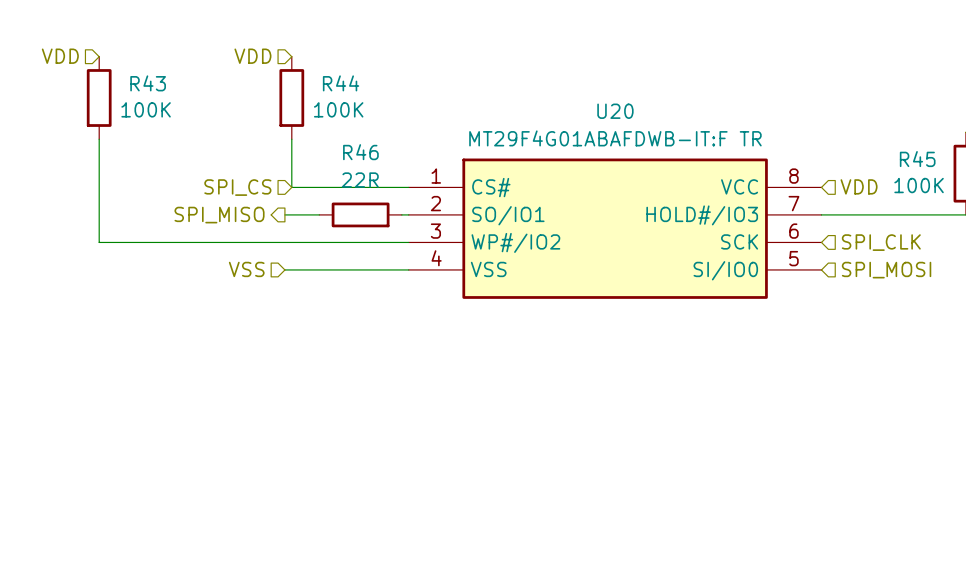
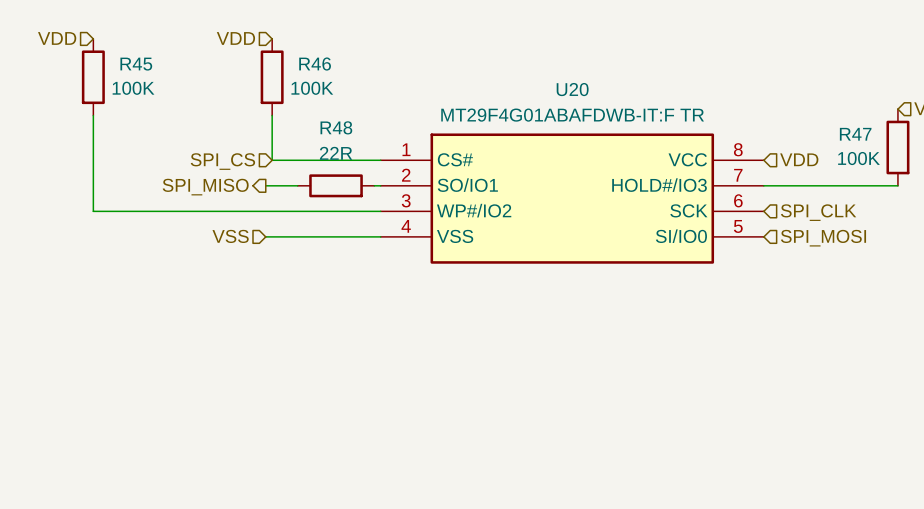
R43 name: R43 (148, 83) -> R45 (136, 64)
R44 name: R44 (341, 83) -> R46 (315, 64)
R46 name: R46 (360, 152) -> R48 (336, 127)
R45 name: R45 (917, 159) -> R47 (855, 134)

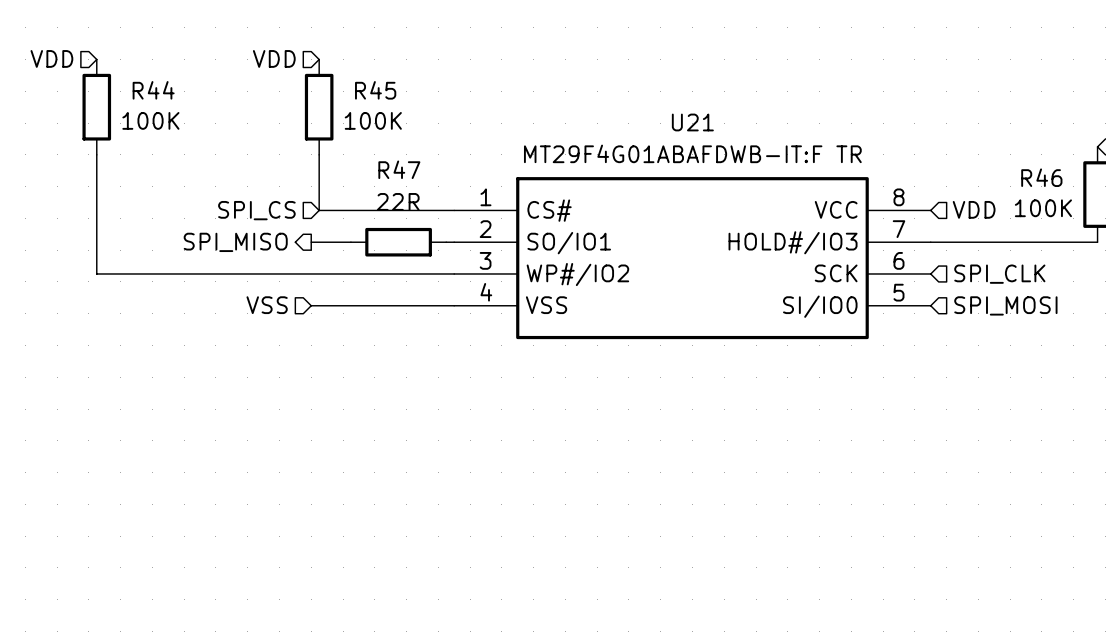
R45 name: R45 (136, 64) -> R44 (153, 90)
R46 name: R46 (315, 64) -> R45 (375, 90)
U20 name: U20 (572, 89) -> U21 (692, 122)
R48 name: R48 (336, 127) -> R47 (399, 169)
R47 name: R47 (855, 134) -> R46 (1041, 177)

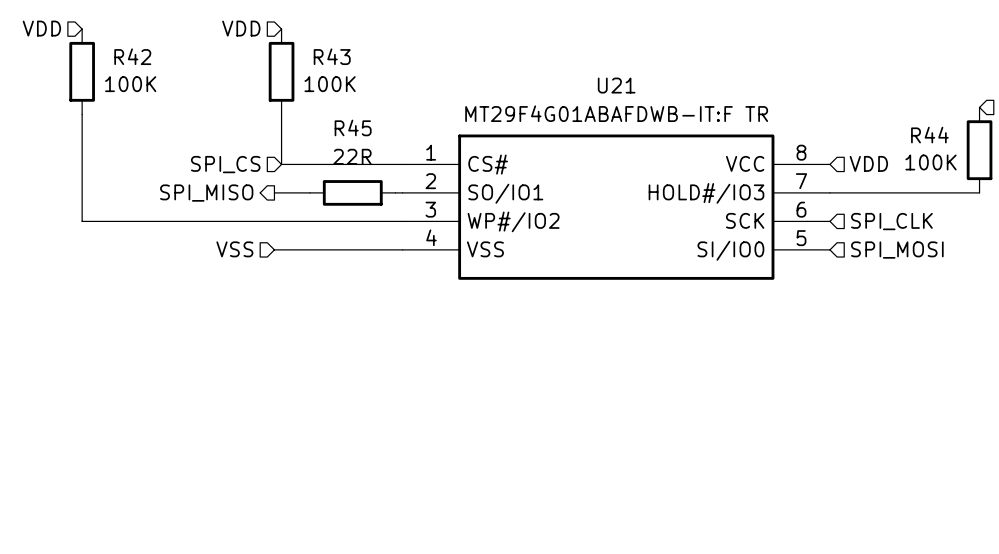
R44 name: R44 (153, 90) -> R42 (132, 56)
R45 name: R45 (375, 90) -> R43 (332, 56)
R47 name: R47 (399, 169) -> R45 (353, 127)
R46 name: R46 (1041, 177) -> R44 (929, 135)

